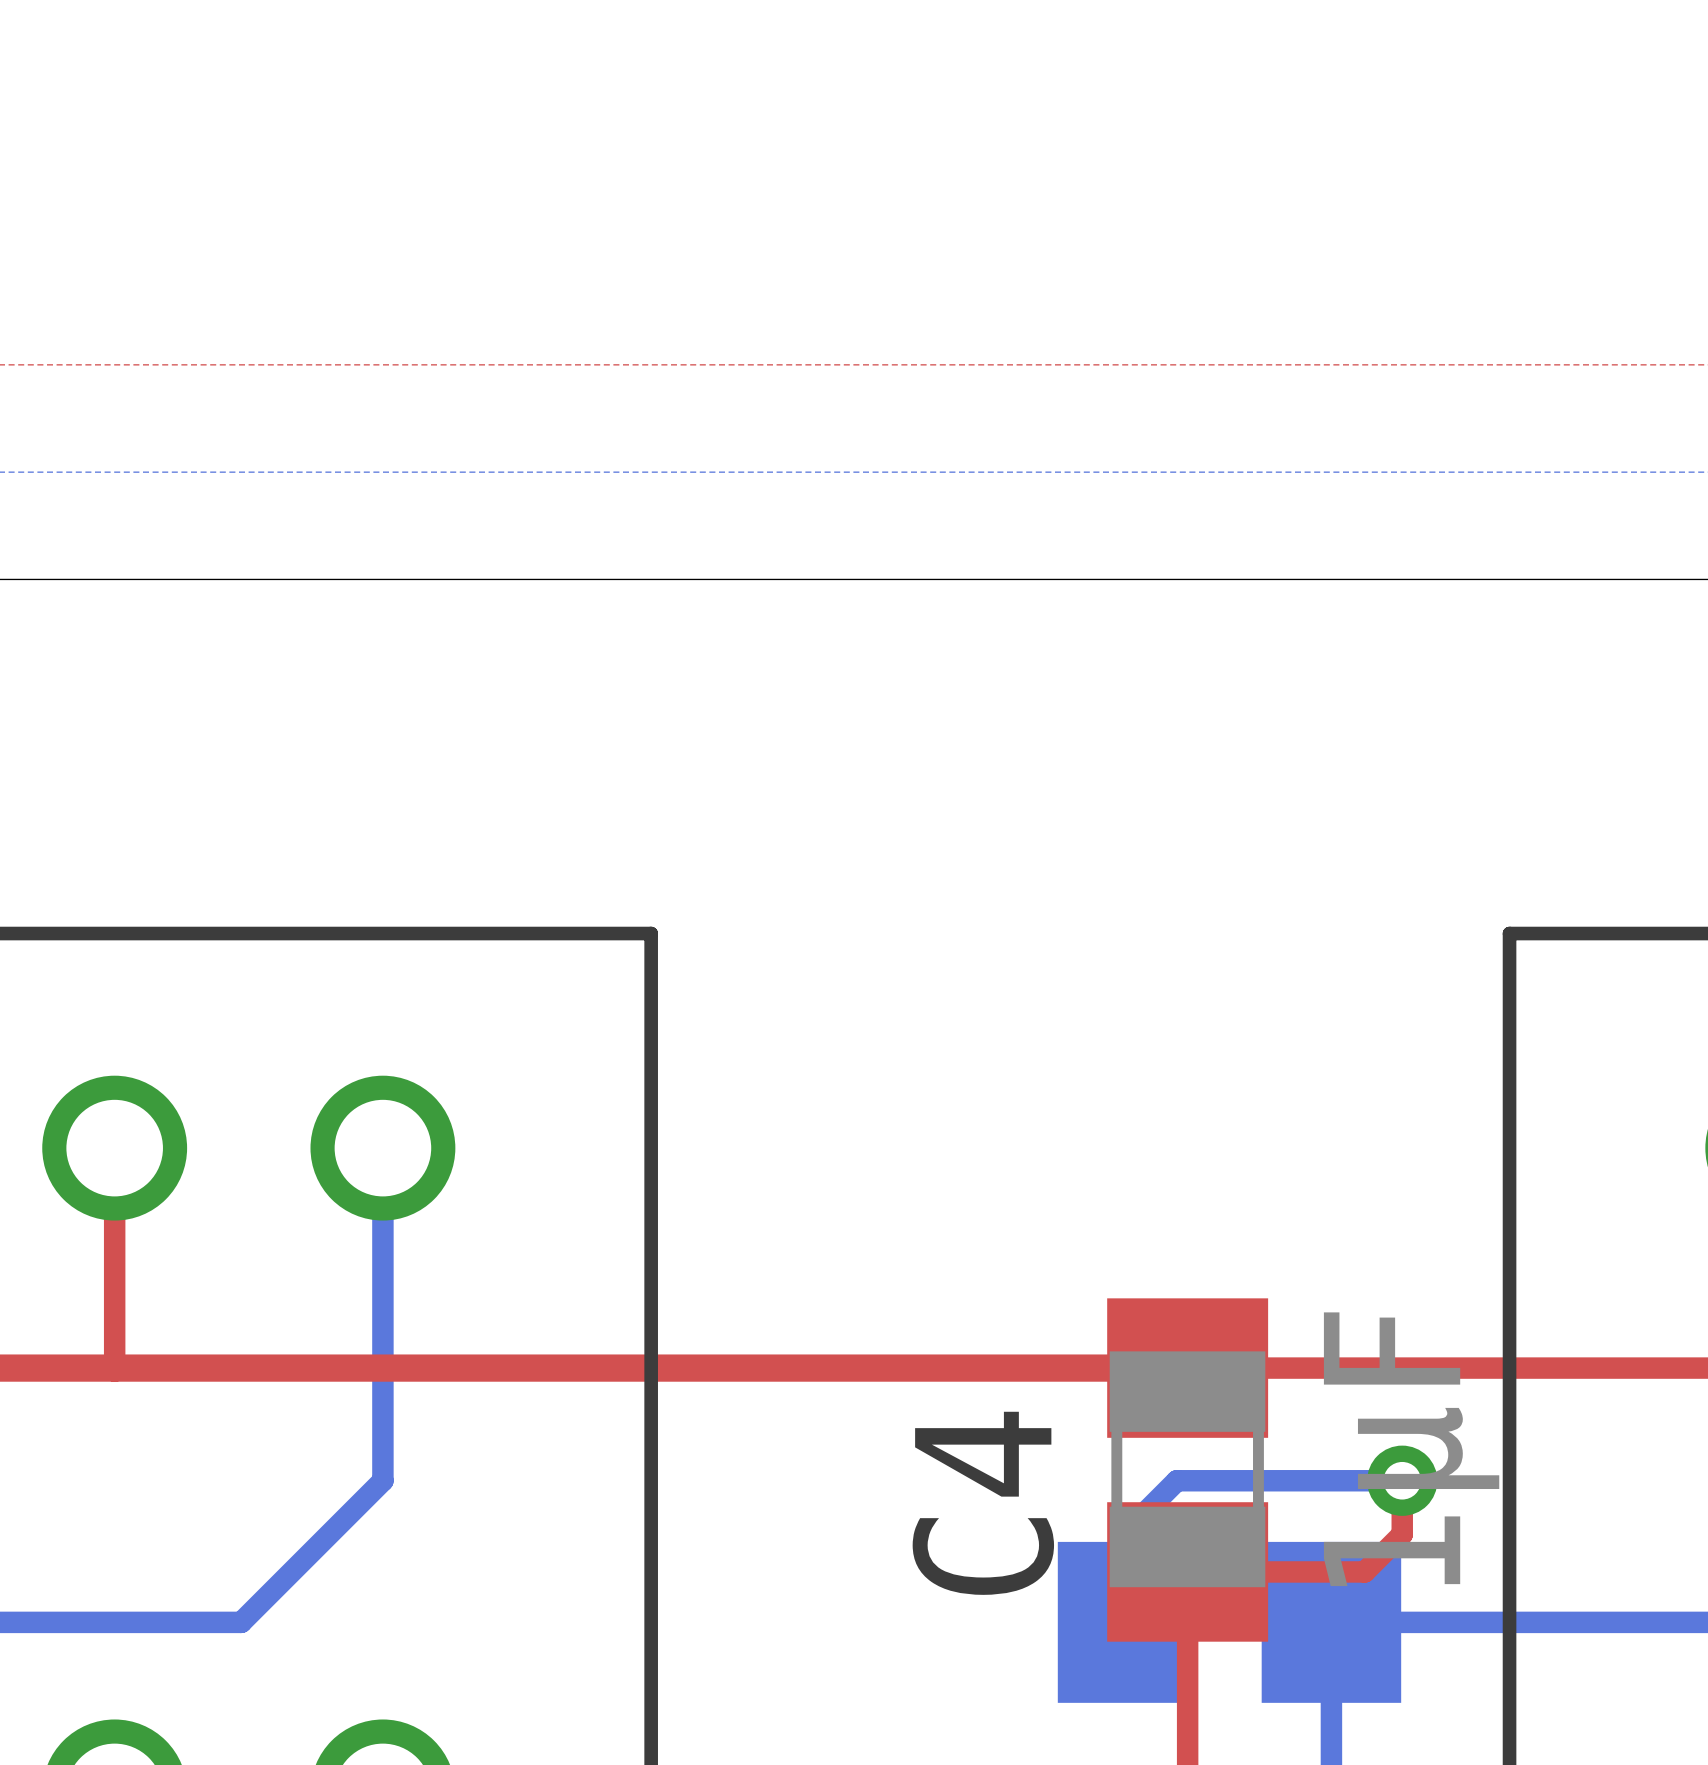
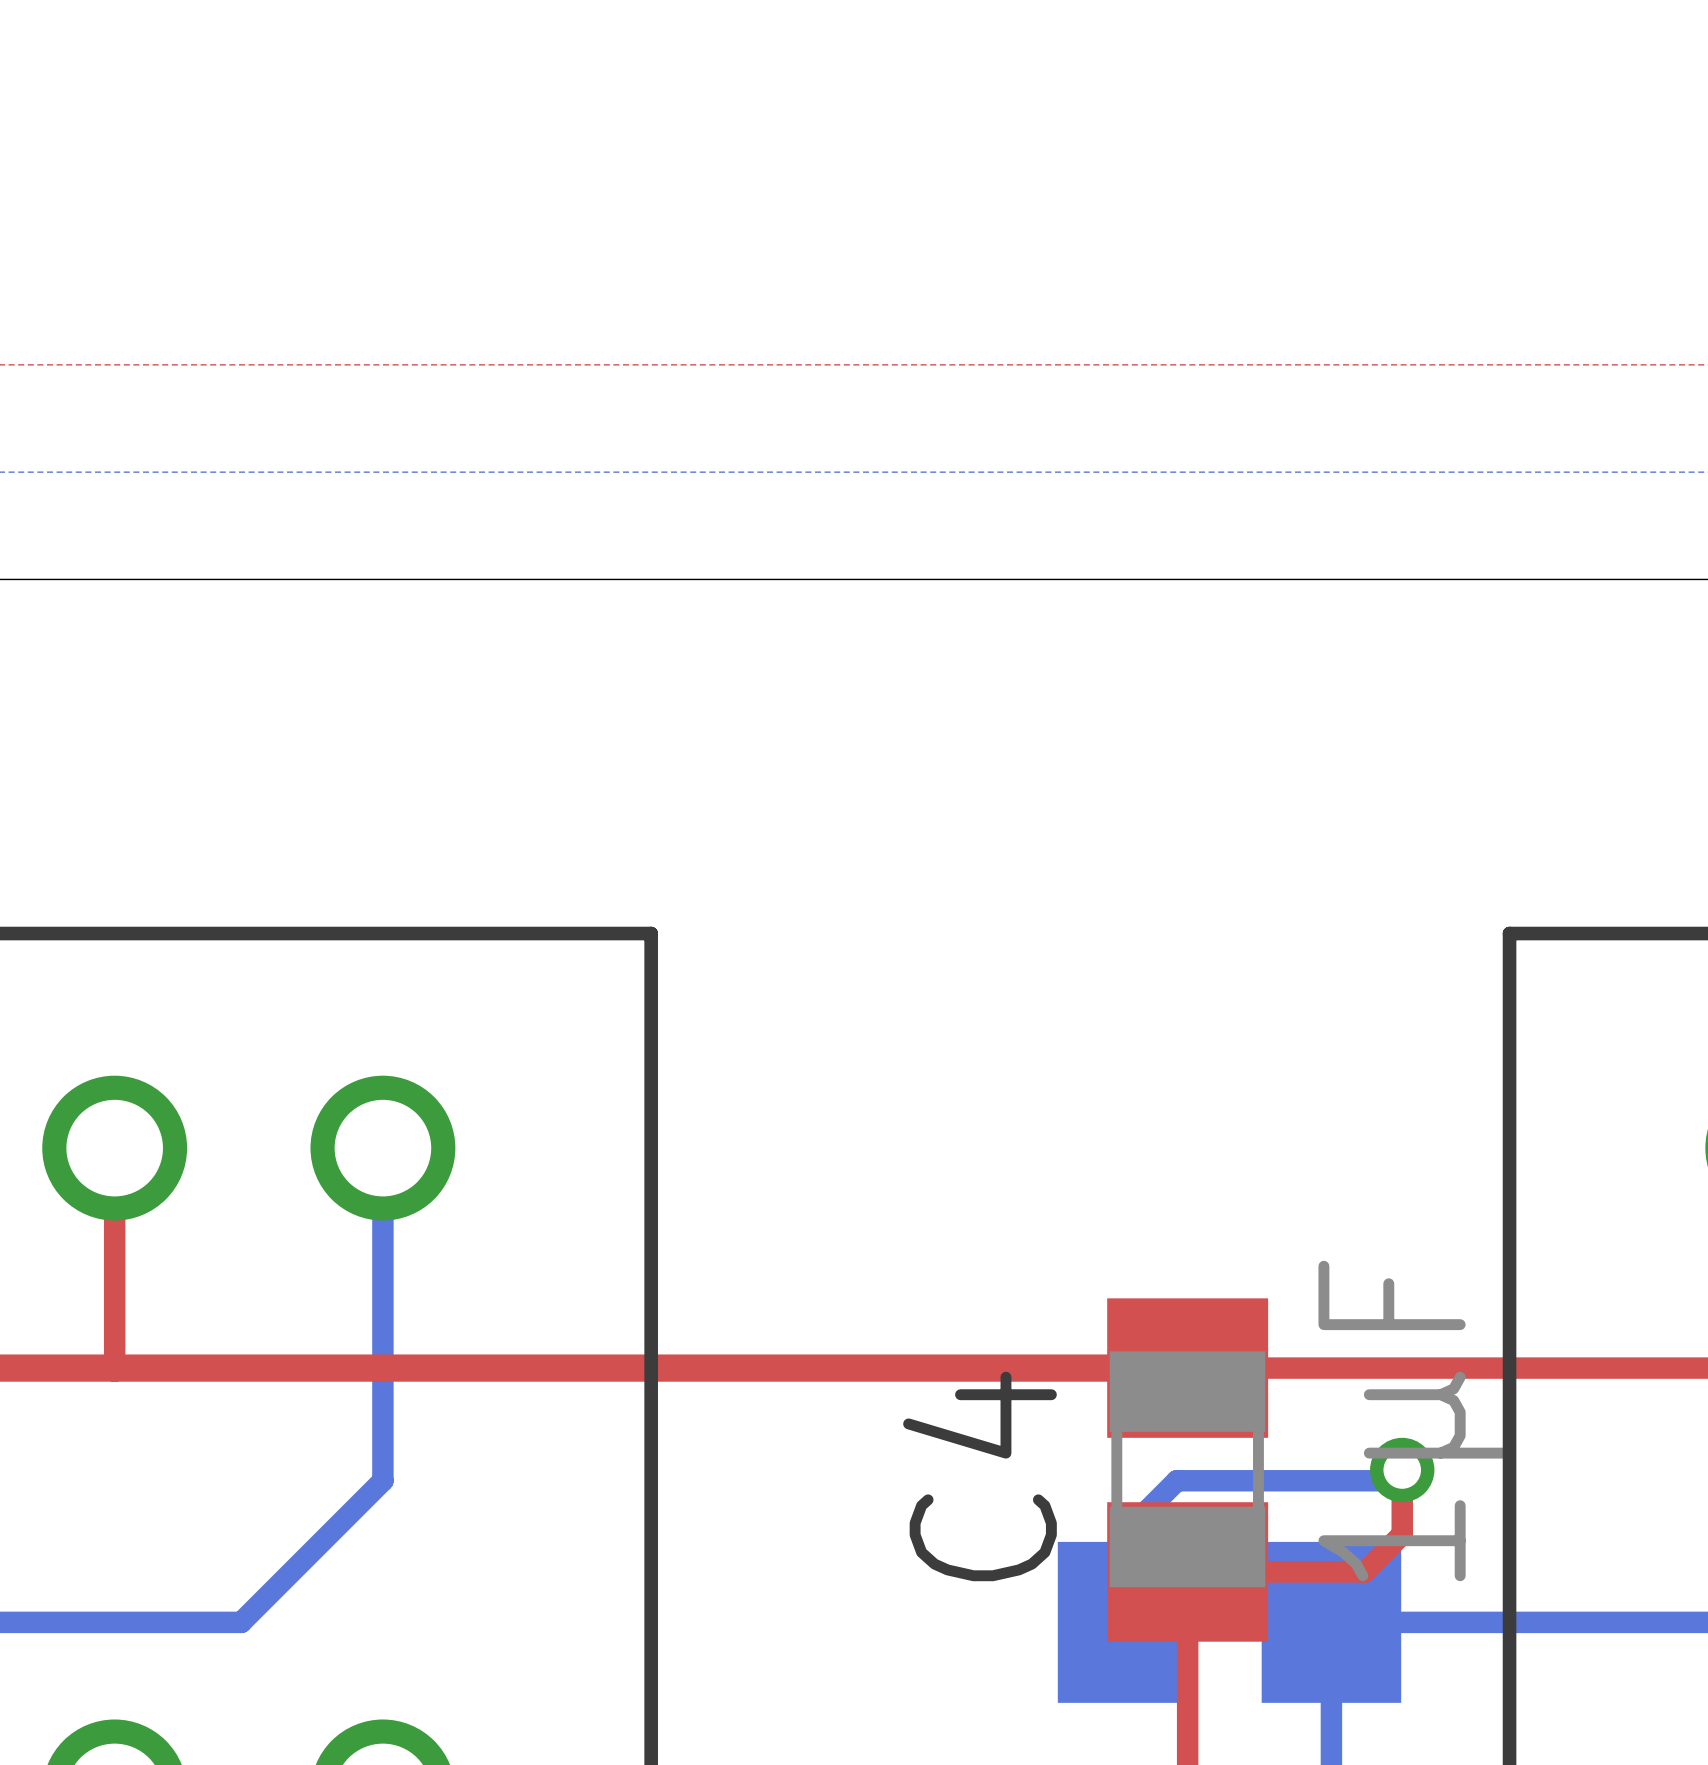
via size: [1367, 1445, 1438, 1516] -> [1370, 1437, 1435, 1503]

